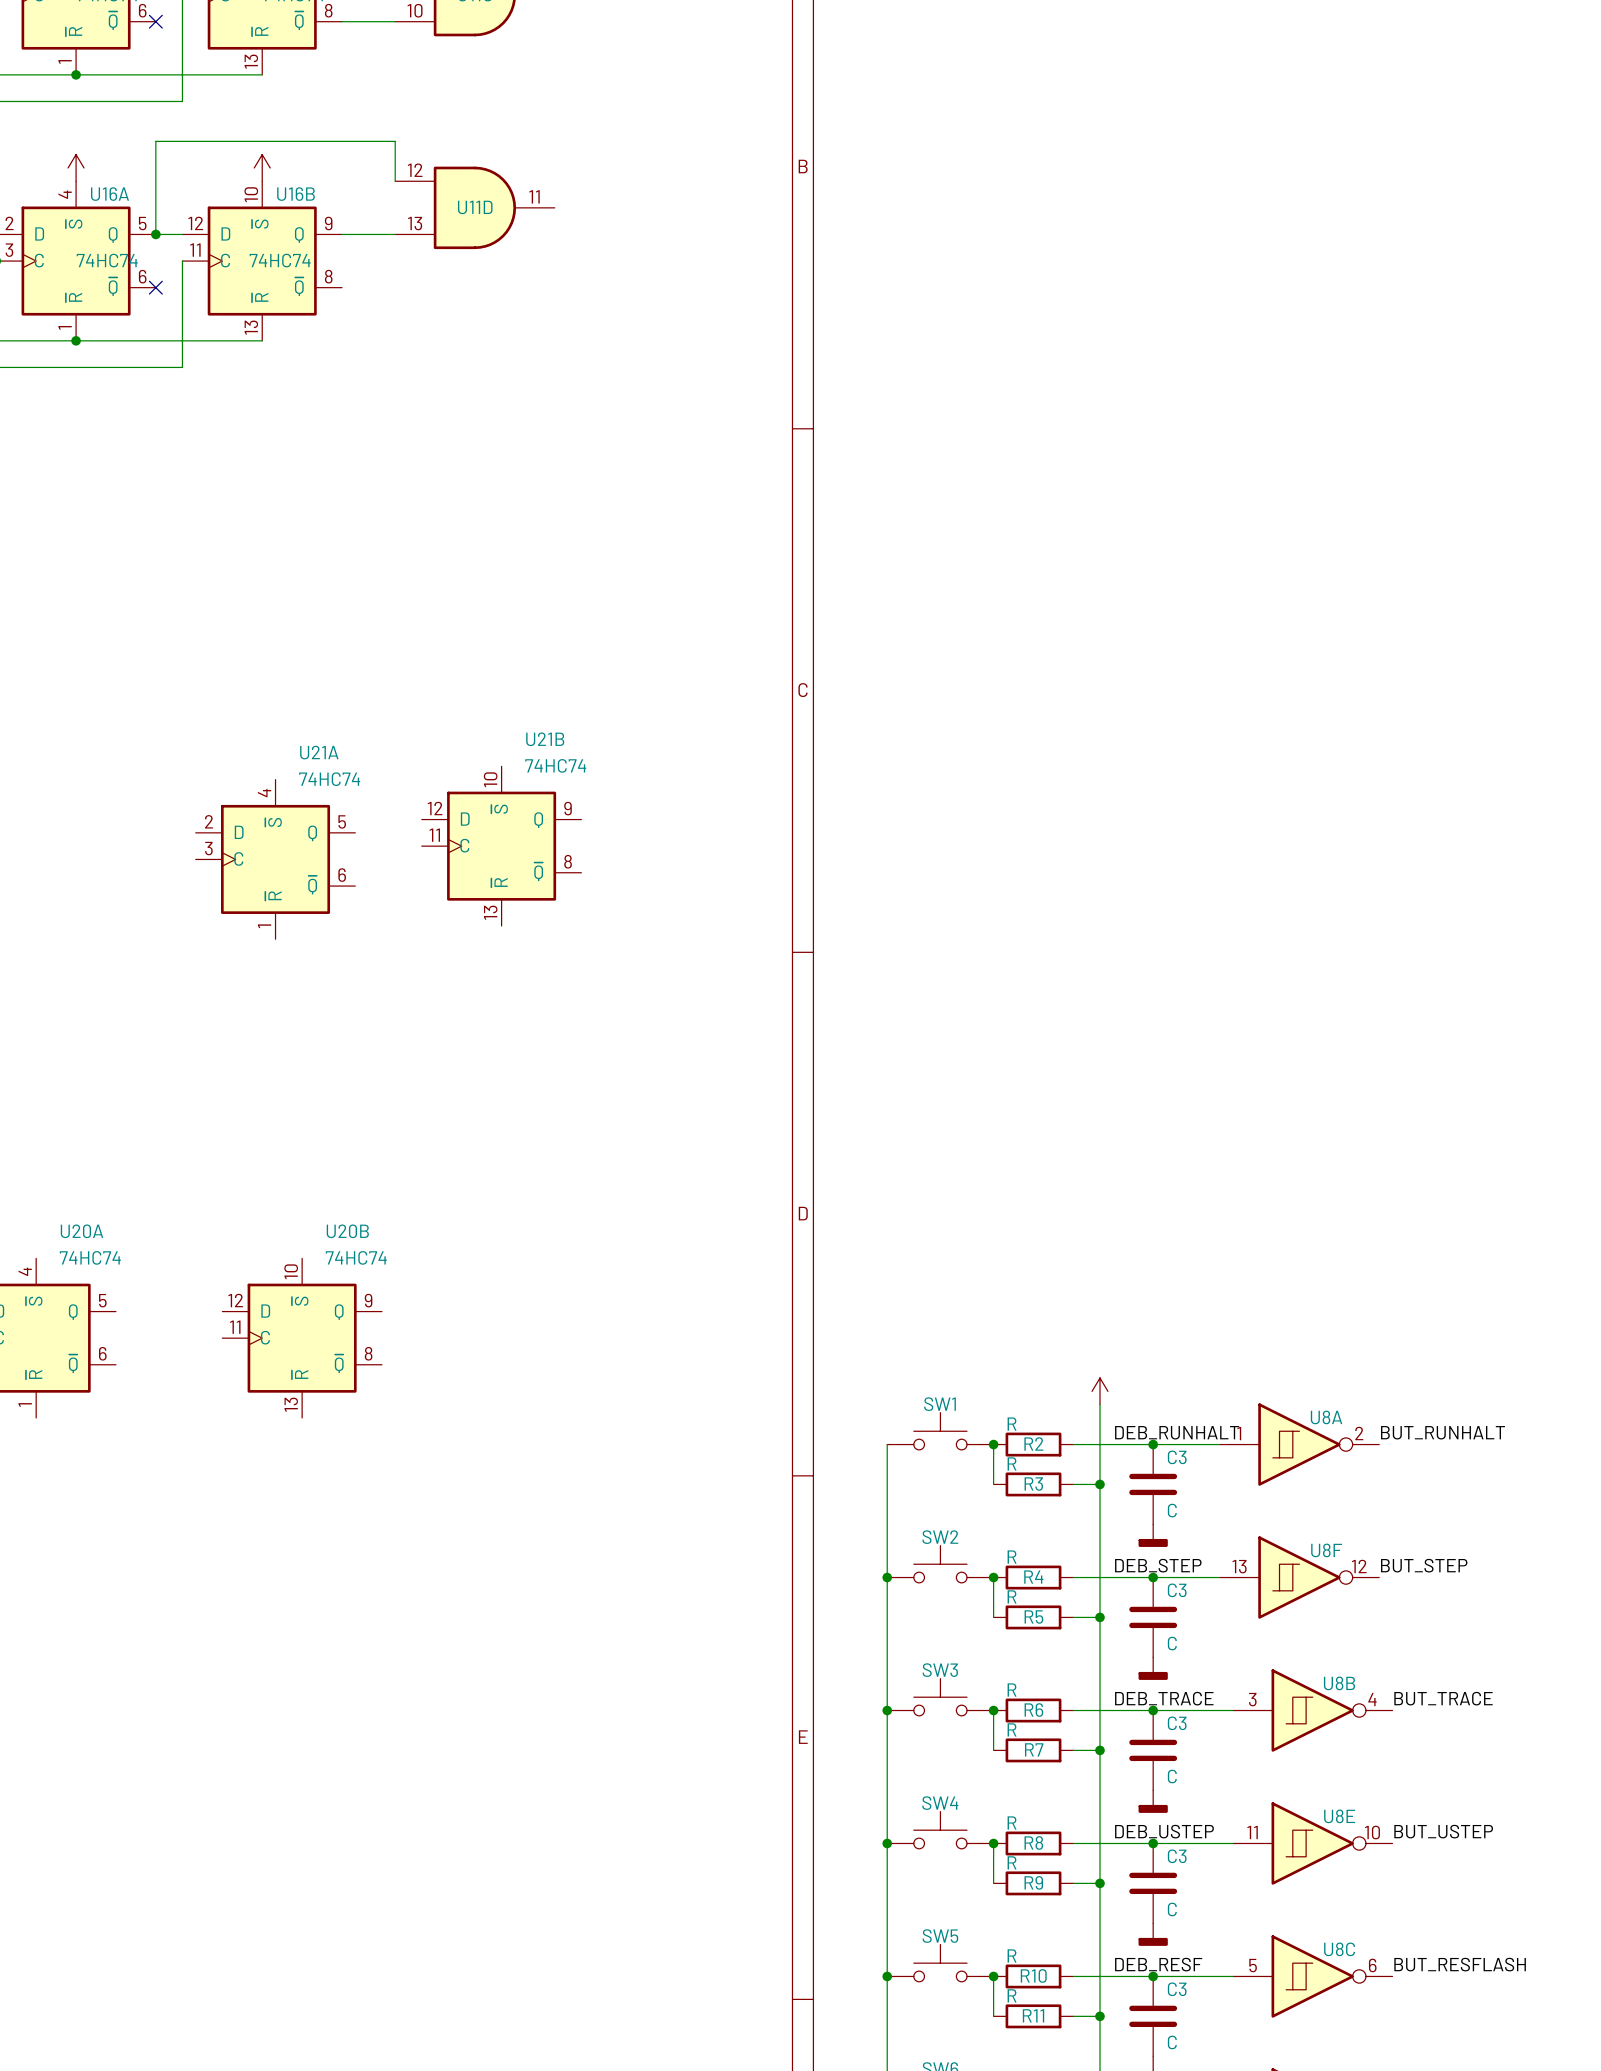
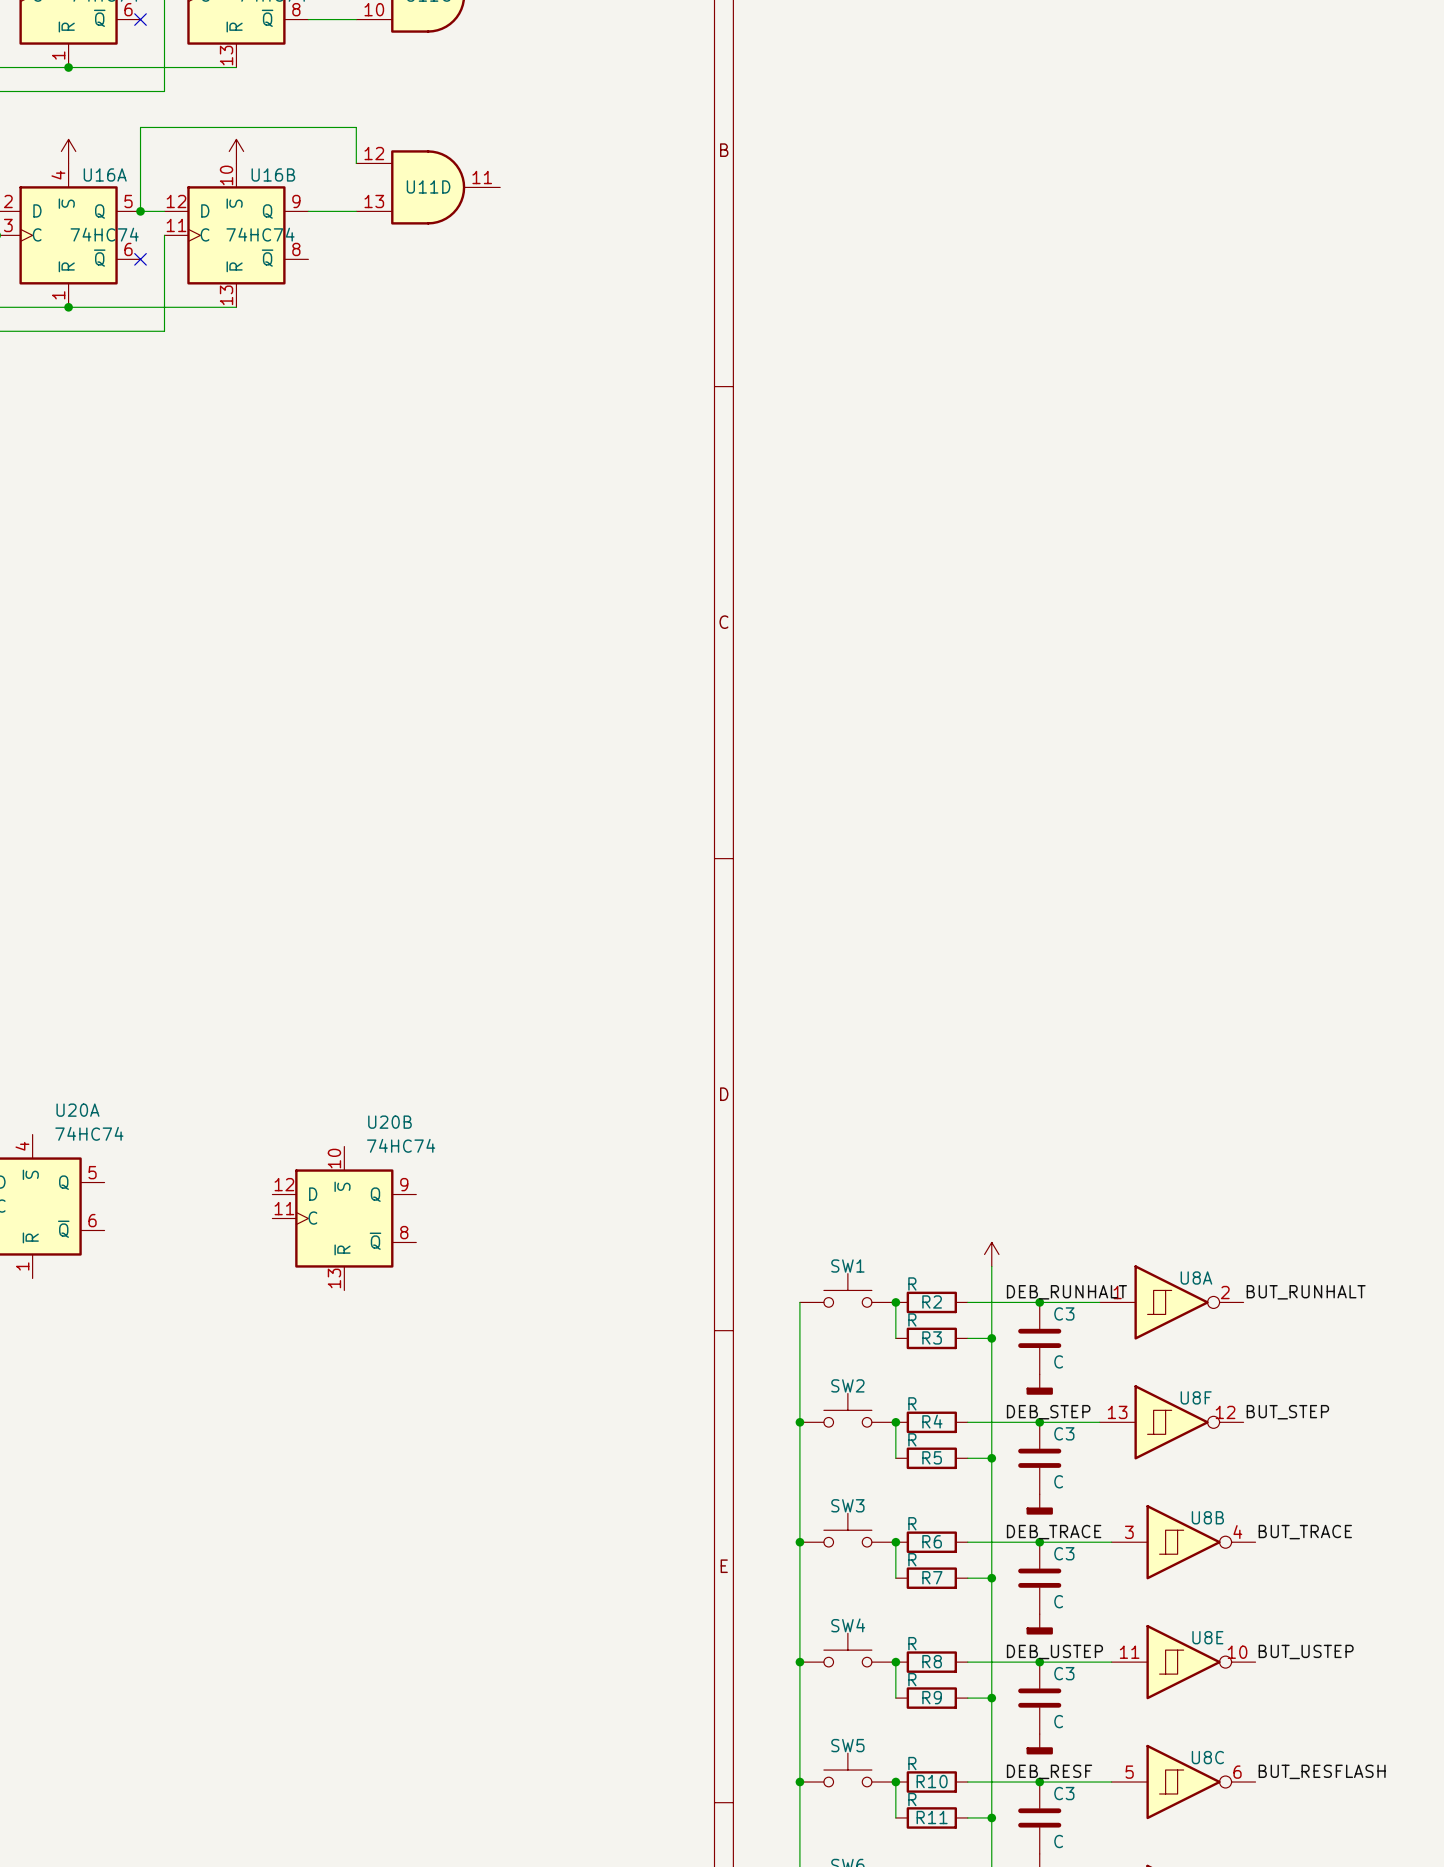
U21B: 74HC74 (501, 846) -> none
U21A: 74HC74 (275, 859) -> none
U20B position: (302, 1338) -> (344, 1218)

